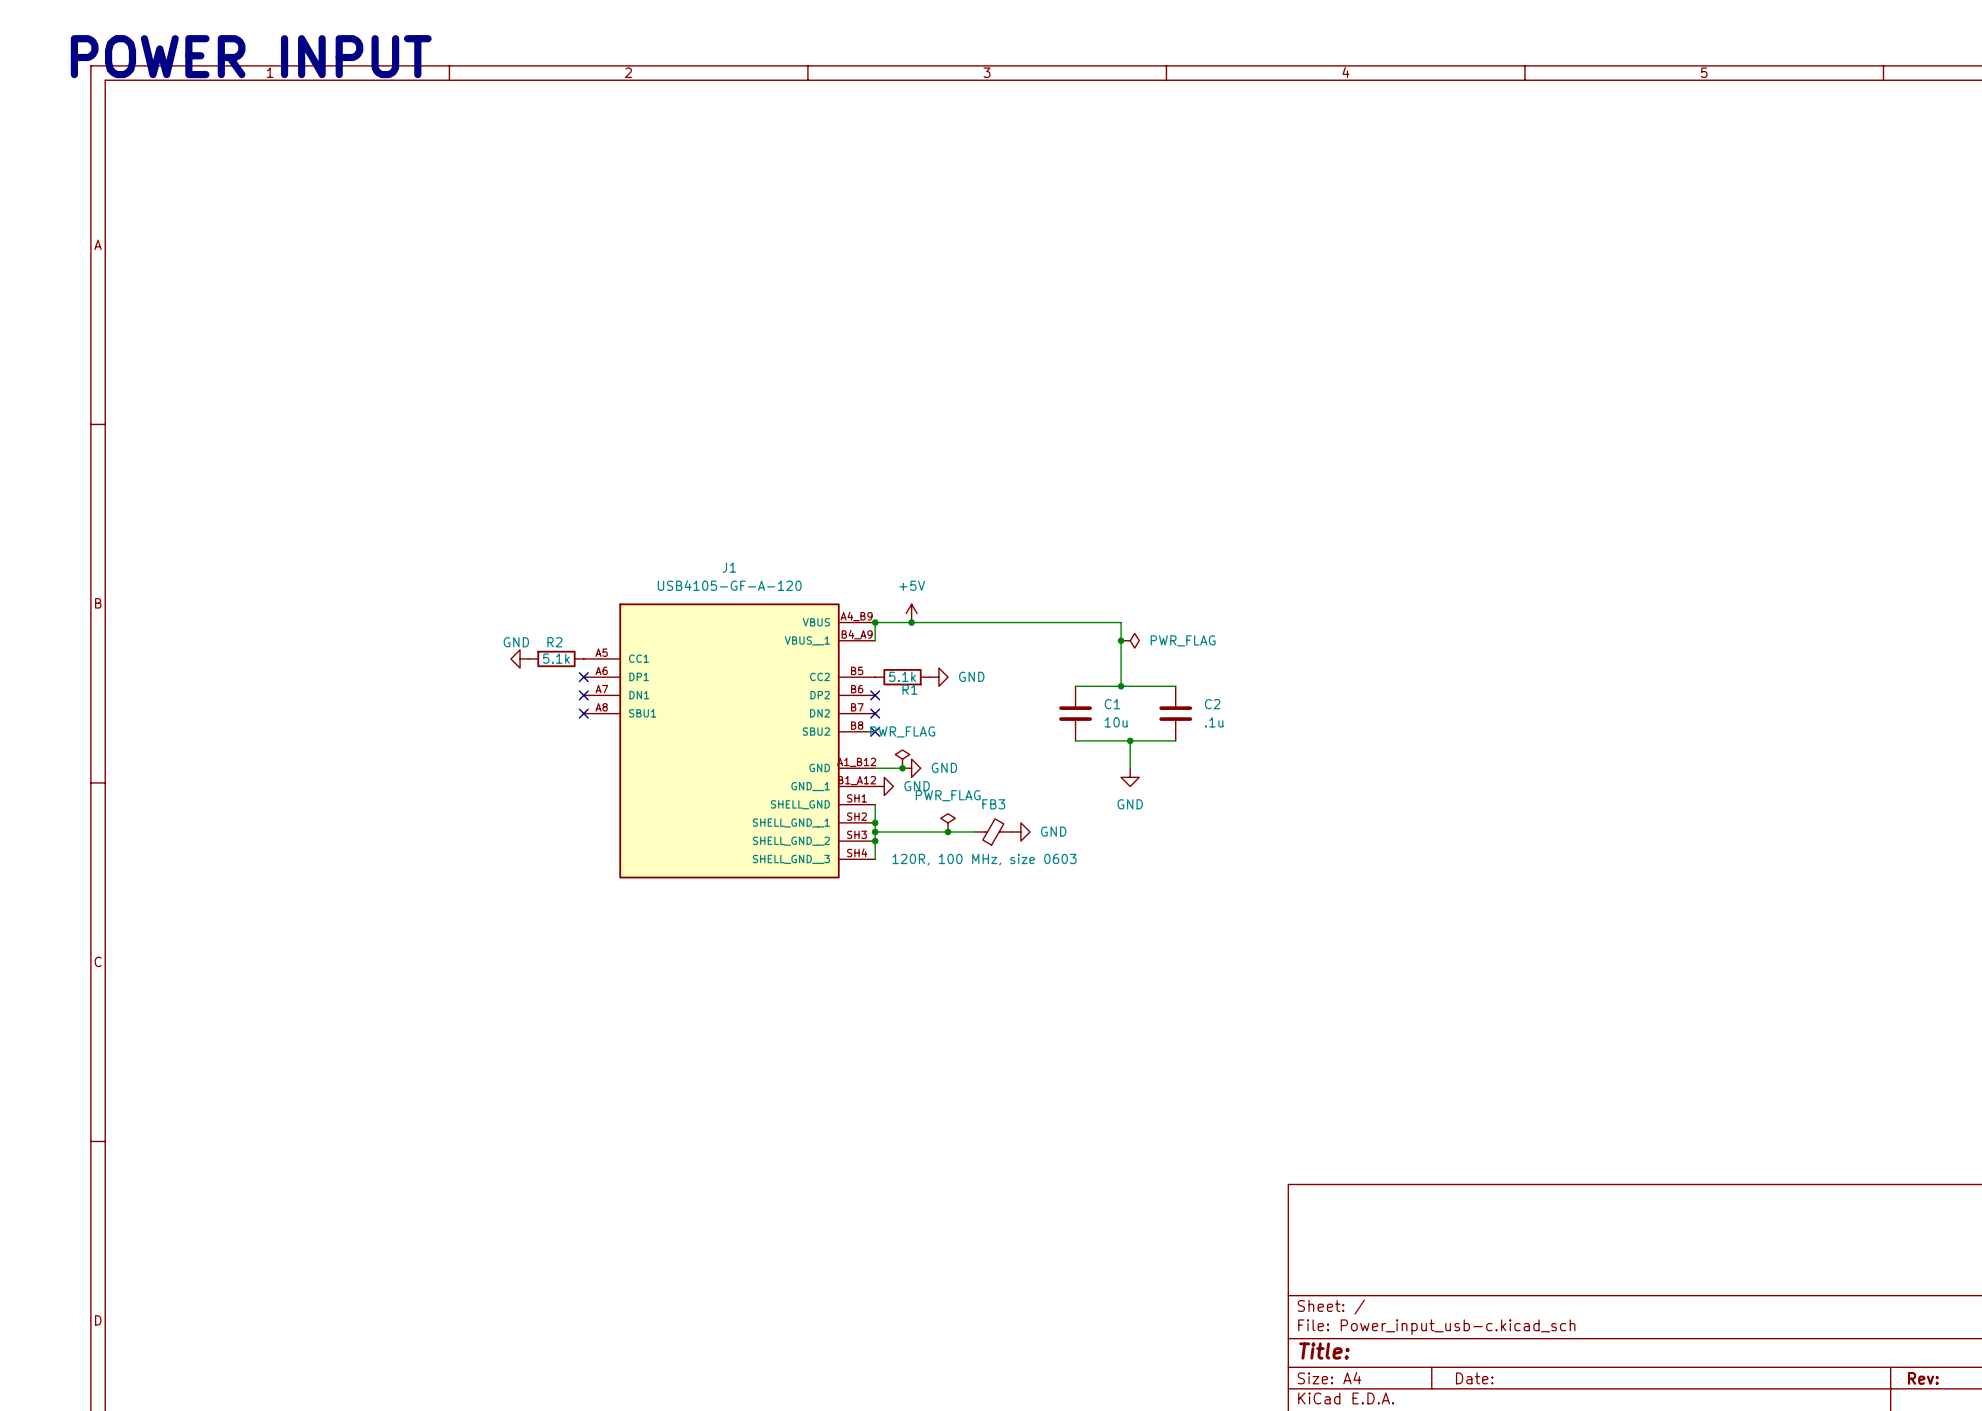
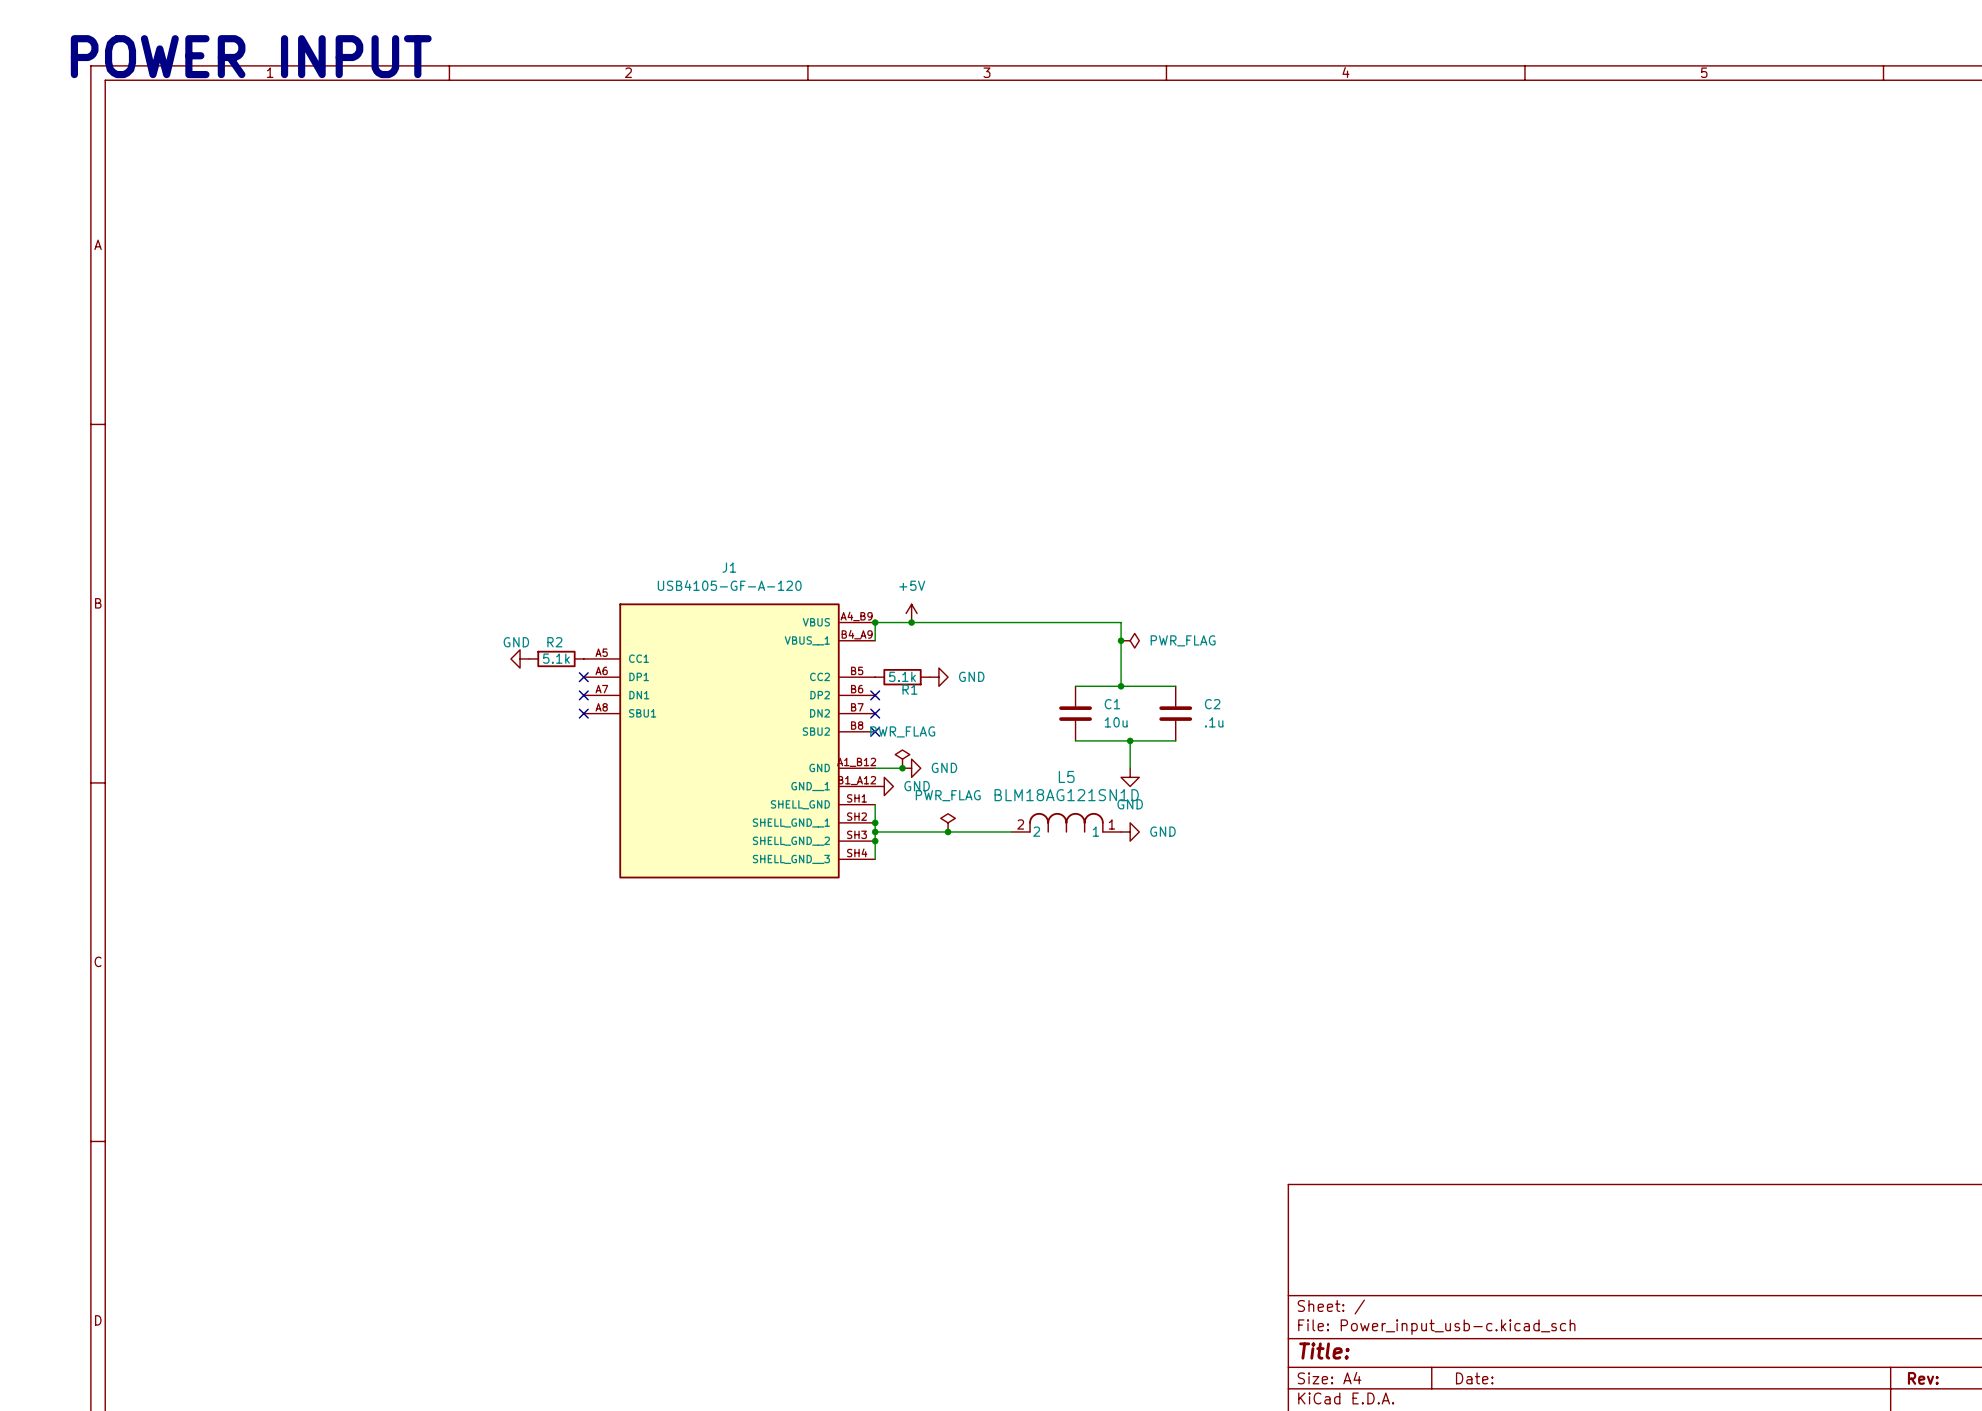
L5: none -> BLM18AG121SN1D (1066, 822)
FB3: 120R, 100 MHz, size 0603 (993, 831) -> none
power symbol position: GND (1020, 831) -> GND (1130, 831)

